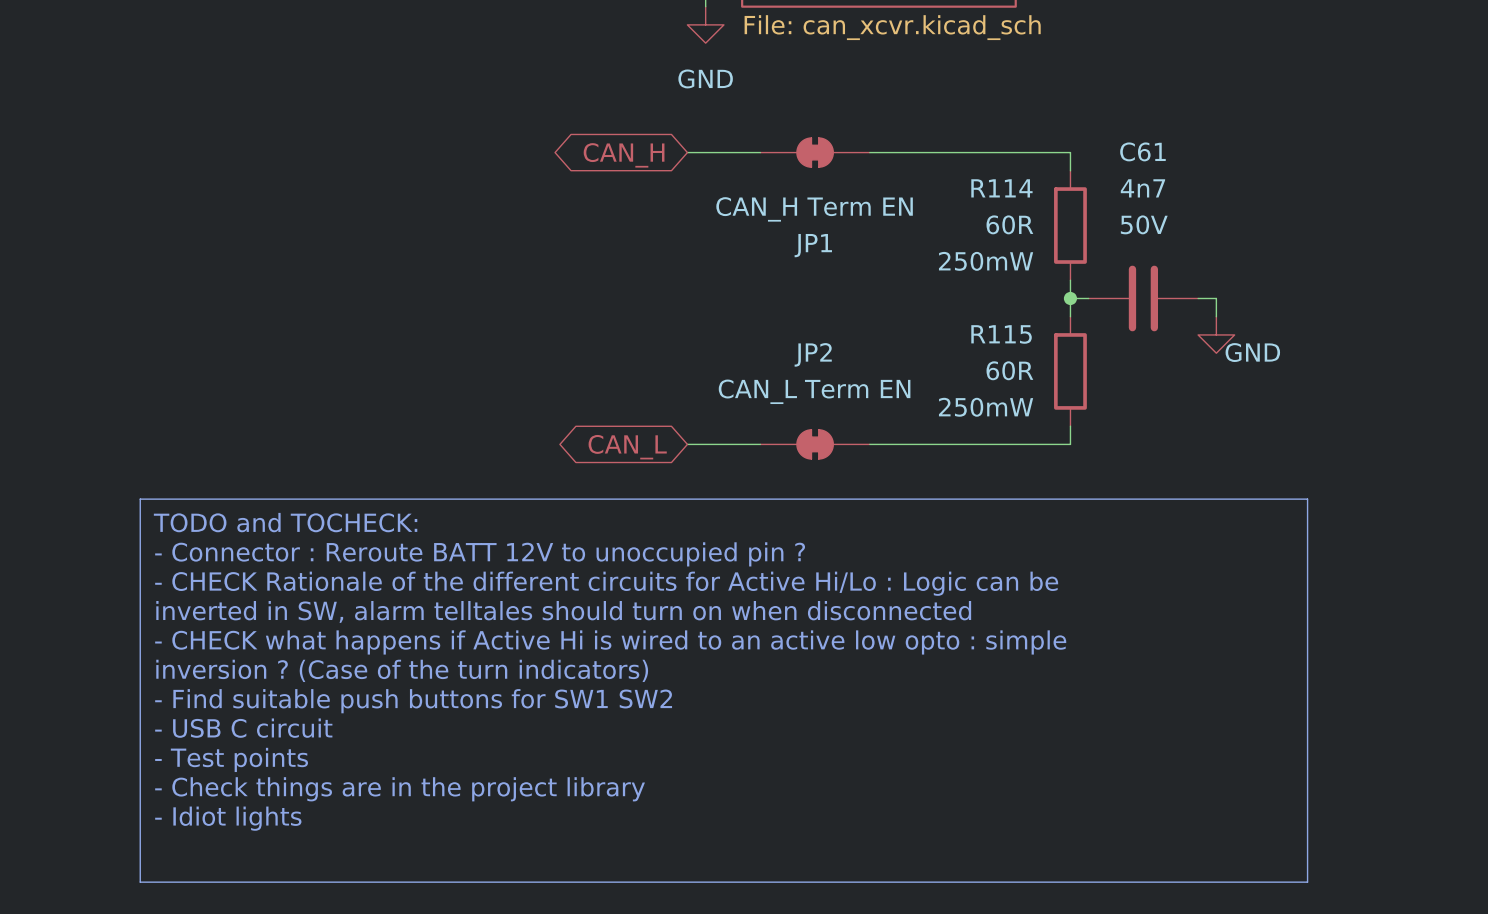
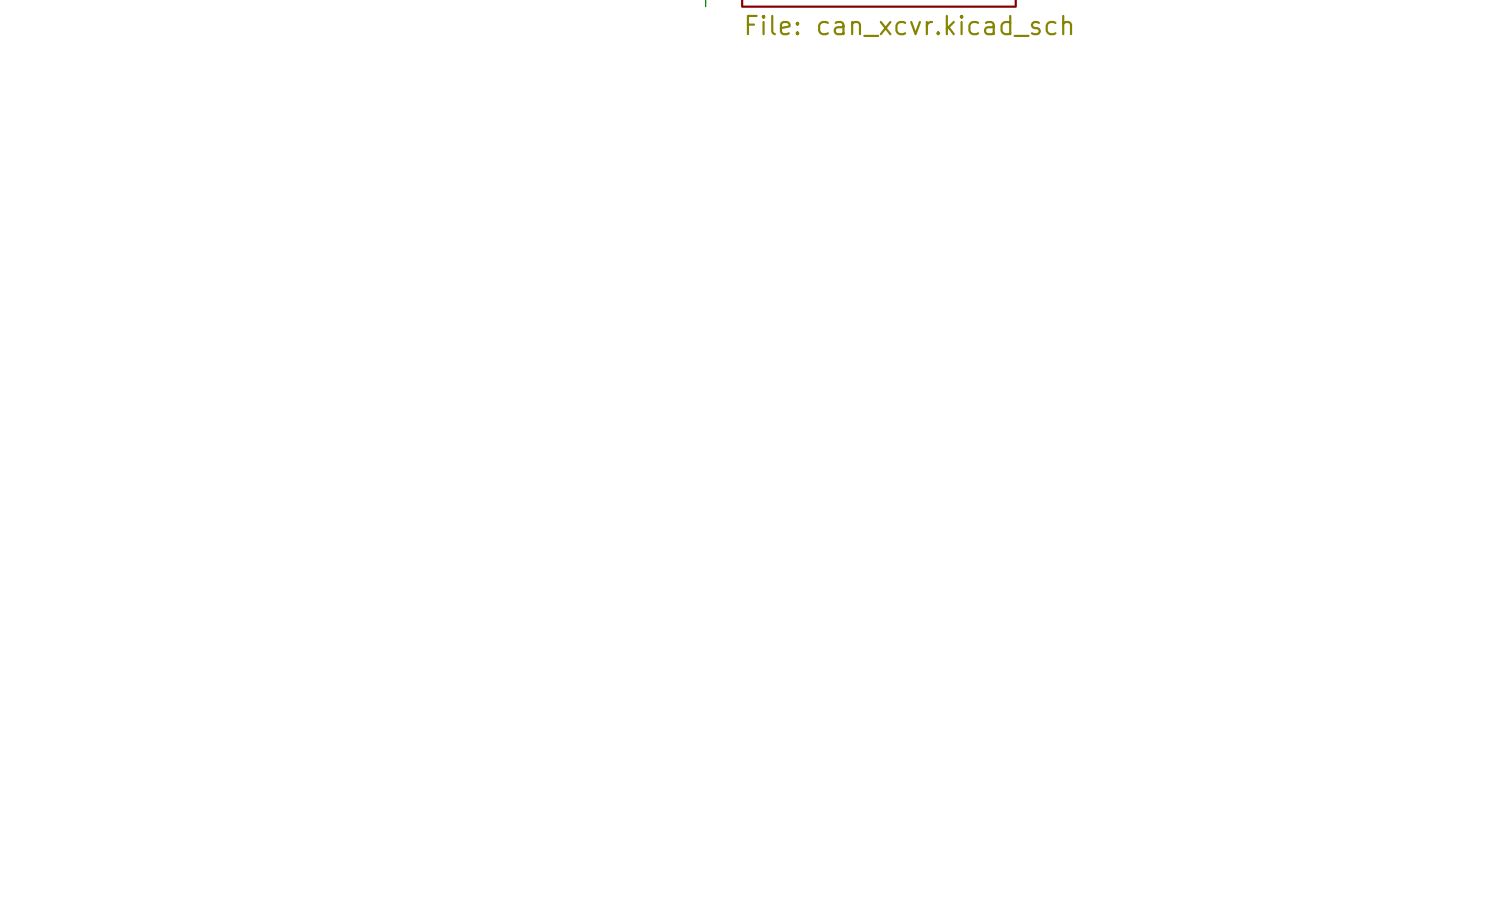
power symbol: GND (705, 24) -> none
wire: (687, 152) (760, 152) -> none
JP1: CAN_H Term EN (815, 152) -> none
wire: (869, 152) (1070, 152) (1070, 170) -> none
global label: CAN_H (624, 155) -> none
R114: 60R (1070, 225) -> none
wire: (1070, 280) (1070, 316) -> none
wire: (1070, 298) (1088, 298) -> none
junction: (1070, 298) -> none
C61: 4n7 (1143, 298) -> none
wire: (1198, 298) (1216, 298) (1216, 316) -> none
power symbol: GND (1216, 334) -> none
R115: 60R (1070, 371) -> none
wire: (1070, 426) (1070, 444) (869, 444) -> none
wire: (687, 444) (760, 444) -> none
JP2: CAN_L Term EN (815, 444) -> none
global label: CAN_L (627, 447) -> none
line: (140, 499) (1307, 499) (1307, 882) (140, 882) (140, 499) -> none
text: TODO and TOCHECK: (285, 522) -> none
text: - Connector : Reroute BATT 12V to unoccupied pin ? (480, 554) -> none
text: - CHECK Rationale of the different circuits for Active Hi/Lo : Logic can be (606, 583) -> none
text: inverted in SW, alarm telltales should turn on when disconnected (563, 611) -> none
text: - CHECK what happens if Active Hi is wired to an active low opto : simple (610, 642) -> none
text: inversion ? (Case of the turn indicators) (402, 670) -> none
text: - Find suitable push buttons for SW1 SW2 (413, 701) -> none
text: - USB C circuit (243, 728) -> none
text: - Test points (231, 759) -> none
text: - Check things are in the project library (400, 789) -> none
text: - Idiot lights (228, 818) -> none

